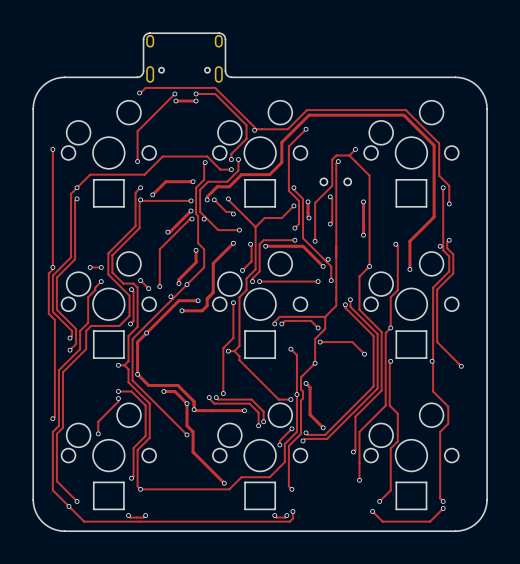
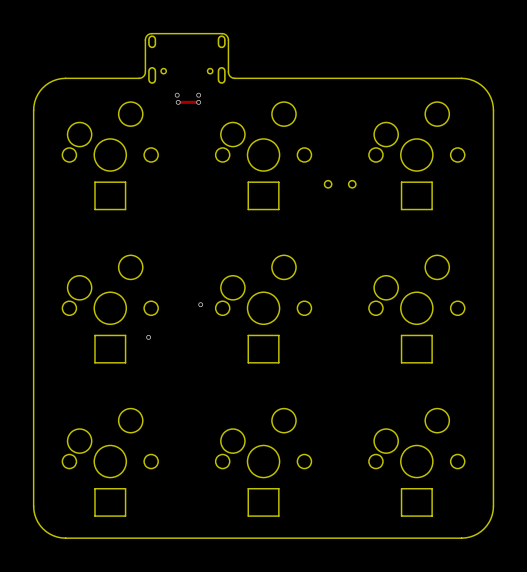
track: (139, 92) (145, 87) (215, 87) (256, 129) -> none
via: (139, 92) -> none
track: (174, 93) (137, 131) (137, 161) -> none
track: (196, 93) (215, 93) (246, 125) (246, 138) (231, 153) (231, 159) -> none
track: (306, 129) (288, 146) (288, 190) (298, 200) (298, 224) (294, 228) -> none
via: (306, 129) -> none
track: (254, 130) (287, 129) (307, 110) (405, 110) (439, 143) (439, 175) (449, 185) (449, 203) -> none
via: (254, 130) -> none
track: (52, 149) (52, 269) (48, 273) (48, 313) (54, 319) (54, 416) (52, 418) -> none
via: (52, 149) -> none
track: (355, 149) (349, 155) -> none
via: (355, 149) -> none
track: (349, 155) (369, 175) (369, 266) (359, 276) (359, 309) (381, 332) (381, 390) (355, 416) (355, 450) (353, 452) -> none
track: (349, 155) (336, 155) (332, 159) (332, 185) (315, 202) (315, 241) -> none
via: (231, 159) -> none
track: (238, 159) (238, 170) (227, 181) (208, 181) (200, 189) (200, 211) (218, 230) (239, 230) -> none
via: (238, 159) -> none
via: (137, 161) -> none
track: (338, 161) (336, 163) (336, 305) (325, 316) -> none
via: (338, 161) -> none
track: (205, 162) (204, 179) (196, 187) (198, 243) (204, 249) (204, 267) (132, 339) (132, 380) (187, 434) -> none
via: (205, 162) -> none
track: (231, 169) (220, 169) (207, 156) (162, 156) (144, 174) (90, 174) (71, 193) (71, 257) (52, 275) (52, 311) (72, 330) (70, 338) -> none
via: (231, 169) -> none
track: (193, 181) (165, 181) (152, 194) -> none
via: (193, 181) -> none
via: (77, 187) -> none
track: (140, 187) (135, 192) (135, 226) (108, 253) (108, 274) (129, 295) (129, 315) (119, 325) (91, 325) (86, 330) (86, 349) (62, 372) (62, 427) (56, 433) (56, 481) (77, 501) -> none
via: (140, 187) -> none
track: (293, 187) (303, 198) (303, 238) (331, 266) (331, 280) -> none
via: (293, 187) -> none
track: (443, 187) (443, 250) (449, 256) (449, 271) (433, 287) (432, 361) (433, 391) (448, 406) (448, 423) (440, 431) (440, 498) (443, 501) -> none
via: (443, 187) -> none
via: (152, 194) -> none
track: (330, 196) (332, 198) (332, 222) (330, 224) -> none
via: (330, 196) -> none
track: (77, 198) (75, 200) (75, 259) (56, 277) (56, 309) (76, 328) (76, 344) (70, 350) -> none
via: (77, 198) -> none
track: (228, 198) (255, 227) -> none
via: (228, 198) -> none
via: (140, 199) -> none
track: (207, 199) (207, 196) (217, 186) (229, 186) (241, 174) (269, 174) (281, 162) (281, 142) (309, 115) (403, 115) (434, 145) (434, 217) (409, 241) (409, 269) -> none
via: (207, 199) -> none
track: (214, 199) (226, 211) (233, 214) -> none
via: (214, 199) -> none
track: (191, 200) (140, 199) (139, 228) (112, 255) (112, 272) (123, 283) (133, 283) (137, 287) (137, 326) (128, 336) (128, 361) (124, 365) -> none
via: (191, 200) -> none
track: (308, 201) (309, 218) -> none
via: (308, 201) -> none
track: (363, 201) (363, 235) -> none
via: (363, 201) -> none
via: (449, 203) -> none
track: (293, 205) (281, 218) (264, 218) (255, 227) -> none
via: (293, 205) -> none
track: (191, 210) (167, 232) -> none
via: (191, 210) -> none
via: (233, 214) -> none
via: (309, 218) -> none
track: (192, 219) (159, 249) (159, 286) -> none
via: (192, 219) -> none
via: (204, 219) -> none
via: (330, 224) -> none
track: (255, 227) (255, 269) (246, 278) (246, 290) (239, 297) (239, 346) (234, 351) -> none
via: (294, 228) -> none
via: (239, 230) -> none
via: (167, 232) -> none
via: (363, 235) -> none
track: (294, 240) (263, 240) (259, 244) (259, 271) (252, 278) (252, 281) -> none
via: (294, 240) -> none
track: (449, 240) (447, 248) (453, 254) (453, 273) (437, 289) (437, 342) (461, 366) -> none
via: (449, 240) -> none
via: (315, 241) -> none
track: (233, 243) (213, 263) (213, 292) (207, 298) (207, 305) (202, 310) (181, 310) -> none
via: (233, 243) -> none
track: (250, 244) (251, 261) (242, 270) -> none
via: (250, 244) -> none
track: (395, 244) (397, 246) (397, 290) (390, 297) (390, 327) (385, 333) (385, 405) (359, 431) (359, 480) -> none
via: (395, 244) -> none
track: (265, 246) (303, 246) (323, 266) -> none
via: (265, 246) -> none
via: (440, 246) -> none
track: (196, 250) (196, 262) (178, 279) (178, 283) -> none
via: (196, 250) -> none
via: (328, 259) -> none
via: (323, 266) -> none
via: (369, 266) -> none
via: (52, 267) -> none
track: (90, 267) (101, 267) -> none
via: (90, 267) -> none
via: (101, 267) -> none
via: (409, 269) -> none
via: (242, 270) -> none
track: (140, 280) (148, 288) -> none
via: (140, 280) -> none
via: (331, 280) -> none
track: (101, 281) (88, 297) (88, 322) (80, 330) (80, 349) (58, 370) (58, 425) (52, 431) (52, 490) (84, 521) (289, 521) (292, 518) (292, 511) -> none
via: (101, 281) -> none
via: (252, 281) -> none
track: (259, 281) (318, 281) -> none
via: (259, 281) -> none
via: (318, 281) -> none
via: (178, 283) -> none
via: (187, 284) -> none
via: (159, 286) -> none
via: (148, 288) -> none
track: (131, 289) (133, 291) (133, 320) (130, 323) -> none
via: (131, 289) -> none
via: (170, 296) -> none
track: (350, 299) (350, 306) (377, 334) (377, 388) (327, 438) (305, 438) (303, 440) -> none
via: (350, 299) -> none
track: (198, 300) (178, 300) (137, 342) (137, 374) (148, 385) (177, 385) (194, 401) (195, 410) (244, 410) -> none
track: (233, 302) (233, 338) (223, 348) (223, 393) -> none
via: (233, 302) -> none
track: (345, 304) (345, 307) (373, 336) (373, 386) (325, 434) (308, 434) (306, 432) -> none
via: (345, 304) -> none
via: (181, 310) -> none
track: (325, 316) (279, 316) (274, 323) -> none
track: (325, 316) (325, 328) (315, 339) (315, 363) (300, 377) (300, 389) (303, 391) (303, 398) (300, 400) (300, 433) (288, 445) (288, 486) (291, 489) -> none
via: (130, 323) -> none
via: (274, 323) -> none
track: (281, 323) (284, 320) (311, 320) (318, 327) -> none
via: (281, 323) -> none
via: (318, 327) -> none
via: (390, 327) -> none
via: (70, 338) -> none
track: (320, 342) (352, 342) (364, 354) -> none
via: (320, 342) -> none
track: (290, 349) (296, 355) (296, 431) (284, 443) (284, 462) (269, 477) (241, 477) (229, 489) (140, 489) (137, 486) (137, 450) (149, 437) (149, 403) (128, 382) (128, 369) (124, 365) -> none
via: (290, 349) -> none
via: (70, 350) -> none
track: (228, 351) (234, 351) -> none
via: (228, 351) -> none
track: (234, 351) (239, 356) (239, 360) (278, 399) (290, 399) -> none
via: (364, 354) -> none
track: (390, 361) (389, 405) (397, 413) (397, 441) (390, 448) (390, 490) (379, 501) -> none
via: (390, 361) -> none
via: (432, 361) -> none
via: (315, 363) -> none
track: (118, 365) (124, 365) -> none
via: (118, 365) -> none
via: (461, 366) -> none
via: (137, 374) -> none
track: (306, 383) (310, 387) (310, 414) (323, 427) -> none
via: (306, 383) -> none
track: (118, 391) (131, 391) (145, 405) (145, 435) (133, 447) (133, 476) (131, 478) -> none
via: (118, 391) -> none
track: (163, 391) (174, 391) (187, 403) (187, 425) (193, 431) (193, 452) (224, 483) -> none
via: (163, 391) -> none
via: (223, 393) -> none
via: (296, 394) -> none
track: (209, 397) (214, 403) (249, 403) (258, 412) (258, 425) -> none
via: (209, 397) -> none
track: (216, 397) (218, 399) (251, 399) (263, 411) (263, 421) -> none
via: (216, 397) -> none
track: (118, 398) (118, 401) (98, 421) (98, 433) -> none
via: (118, 398) -> none
via: (290, 399) -> none
via: (187, 403) -> none
via: (194, 409) -> none
via: (244, 410) -> none
via: (52, 418) -> none
via: (263, 421) -> none
via: (258, 425) -> none
via: (323, 427) -> none
track: (291, 428) (279, 440) (279, 444) -> none
via: (291, 428) -> none
via: (306, 432) -> none
via: (98, 433) -> none
via: (187, 434) -> none
via: (303, 440) -> none
via: (279, 444) -> none
via: (353, 452) -> none
via: (131, 478) -> none
via: (359, 480) -> none
via: (224, 483) -> none
via: (140, 489) -> none
via: (291, 489) -> none
via: (77, 501) -> none
via: (379, 501) -> none
via: (443, 501) -> none
via: (69, 506) -> none
track: (443, 508) (430, 521) (382, 521) (372, 511) -> none
via: (443, 508) -> none
via: (292, 511) -> none
via: (372, 511) -> none
track: (128, 515) (130, 517) (143, 517) (145, 515) -> none
via: (128, 515) -> none
via: (145, 515) -> none
track: (274, 515) (276, 517) (284, 517) (286, 515) -> none
via: (274, 515) -> none
via: (286, 515) -> none

